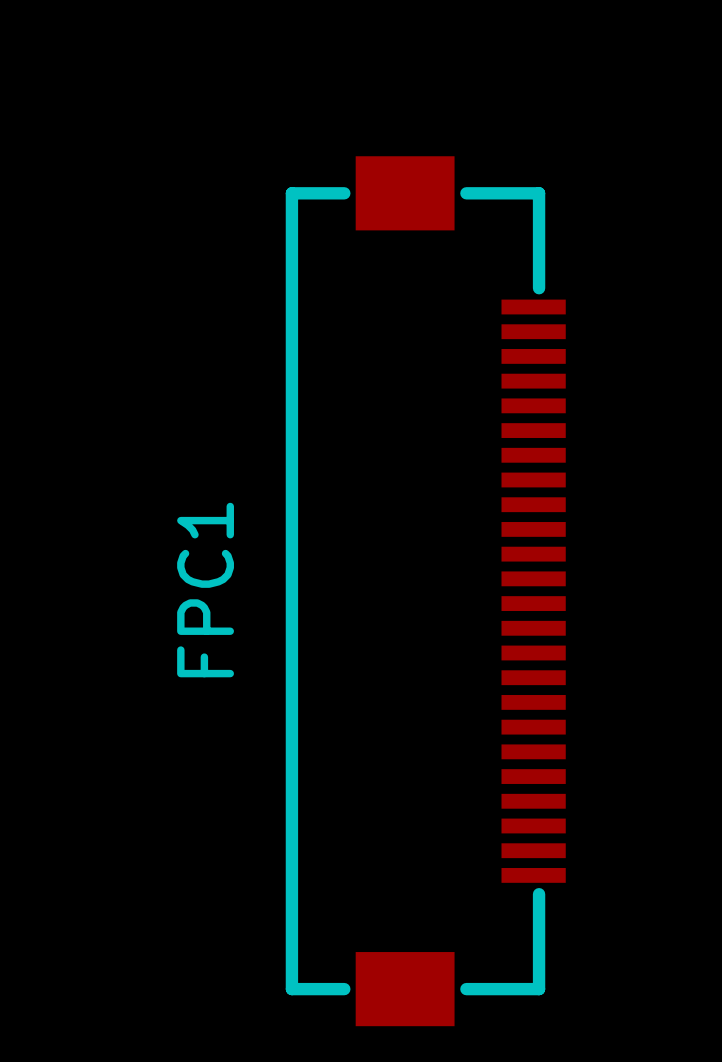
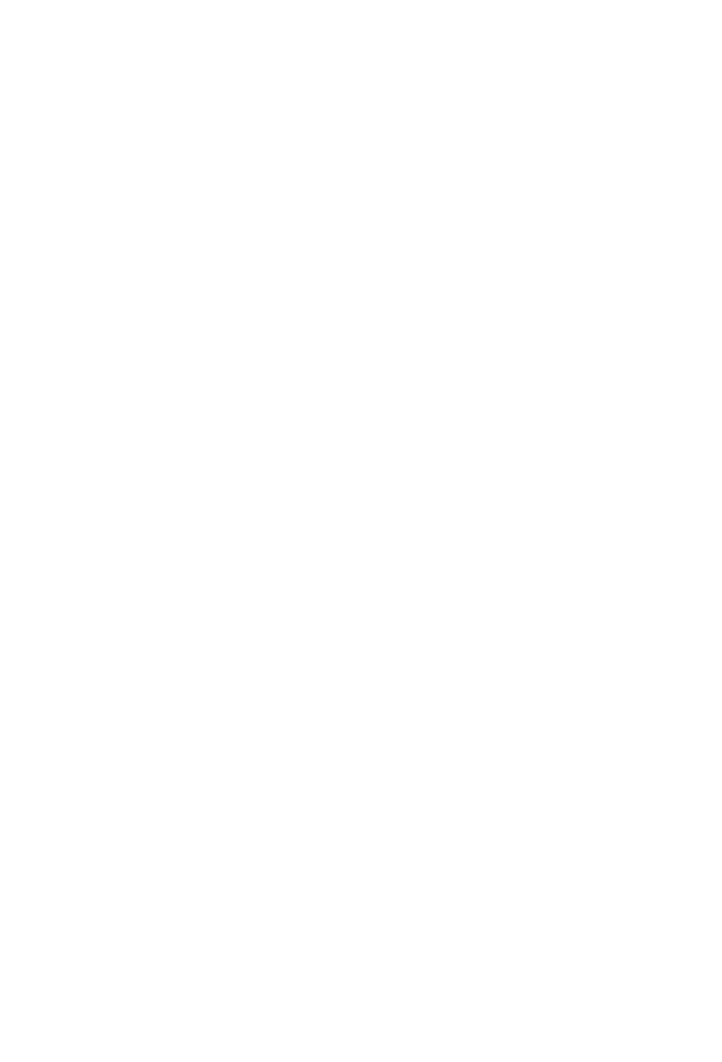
FPC1: (425, 591) -> none

